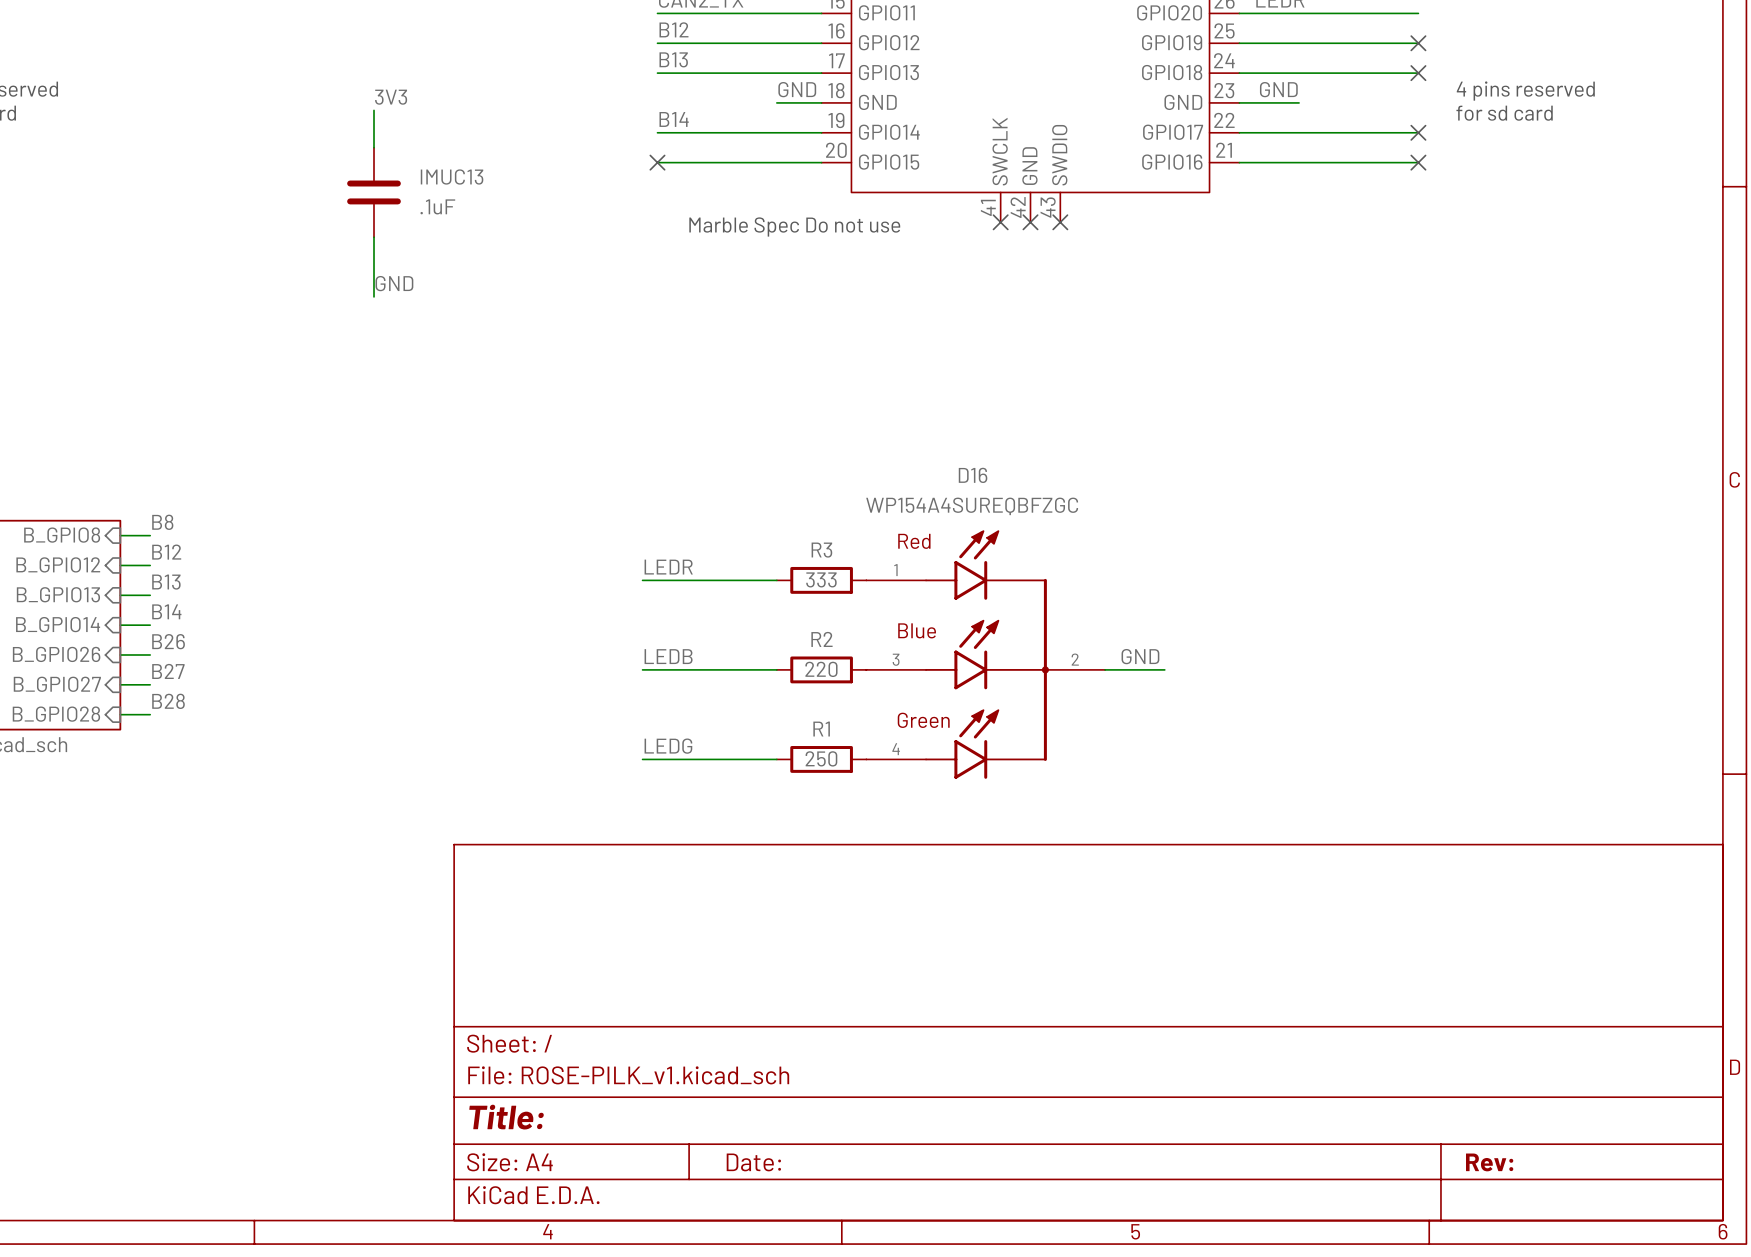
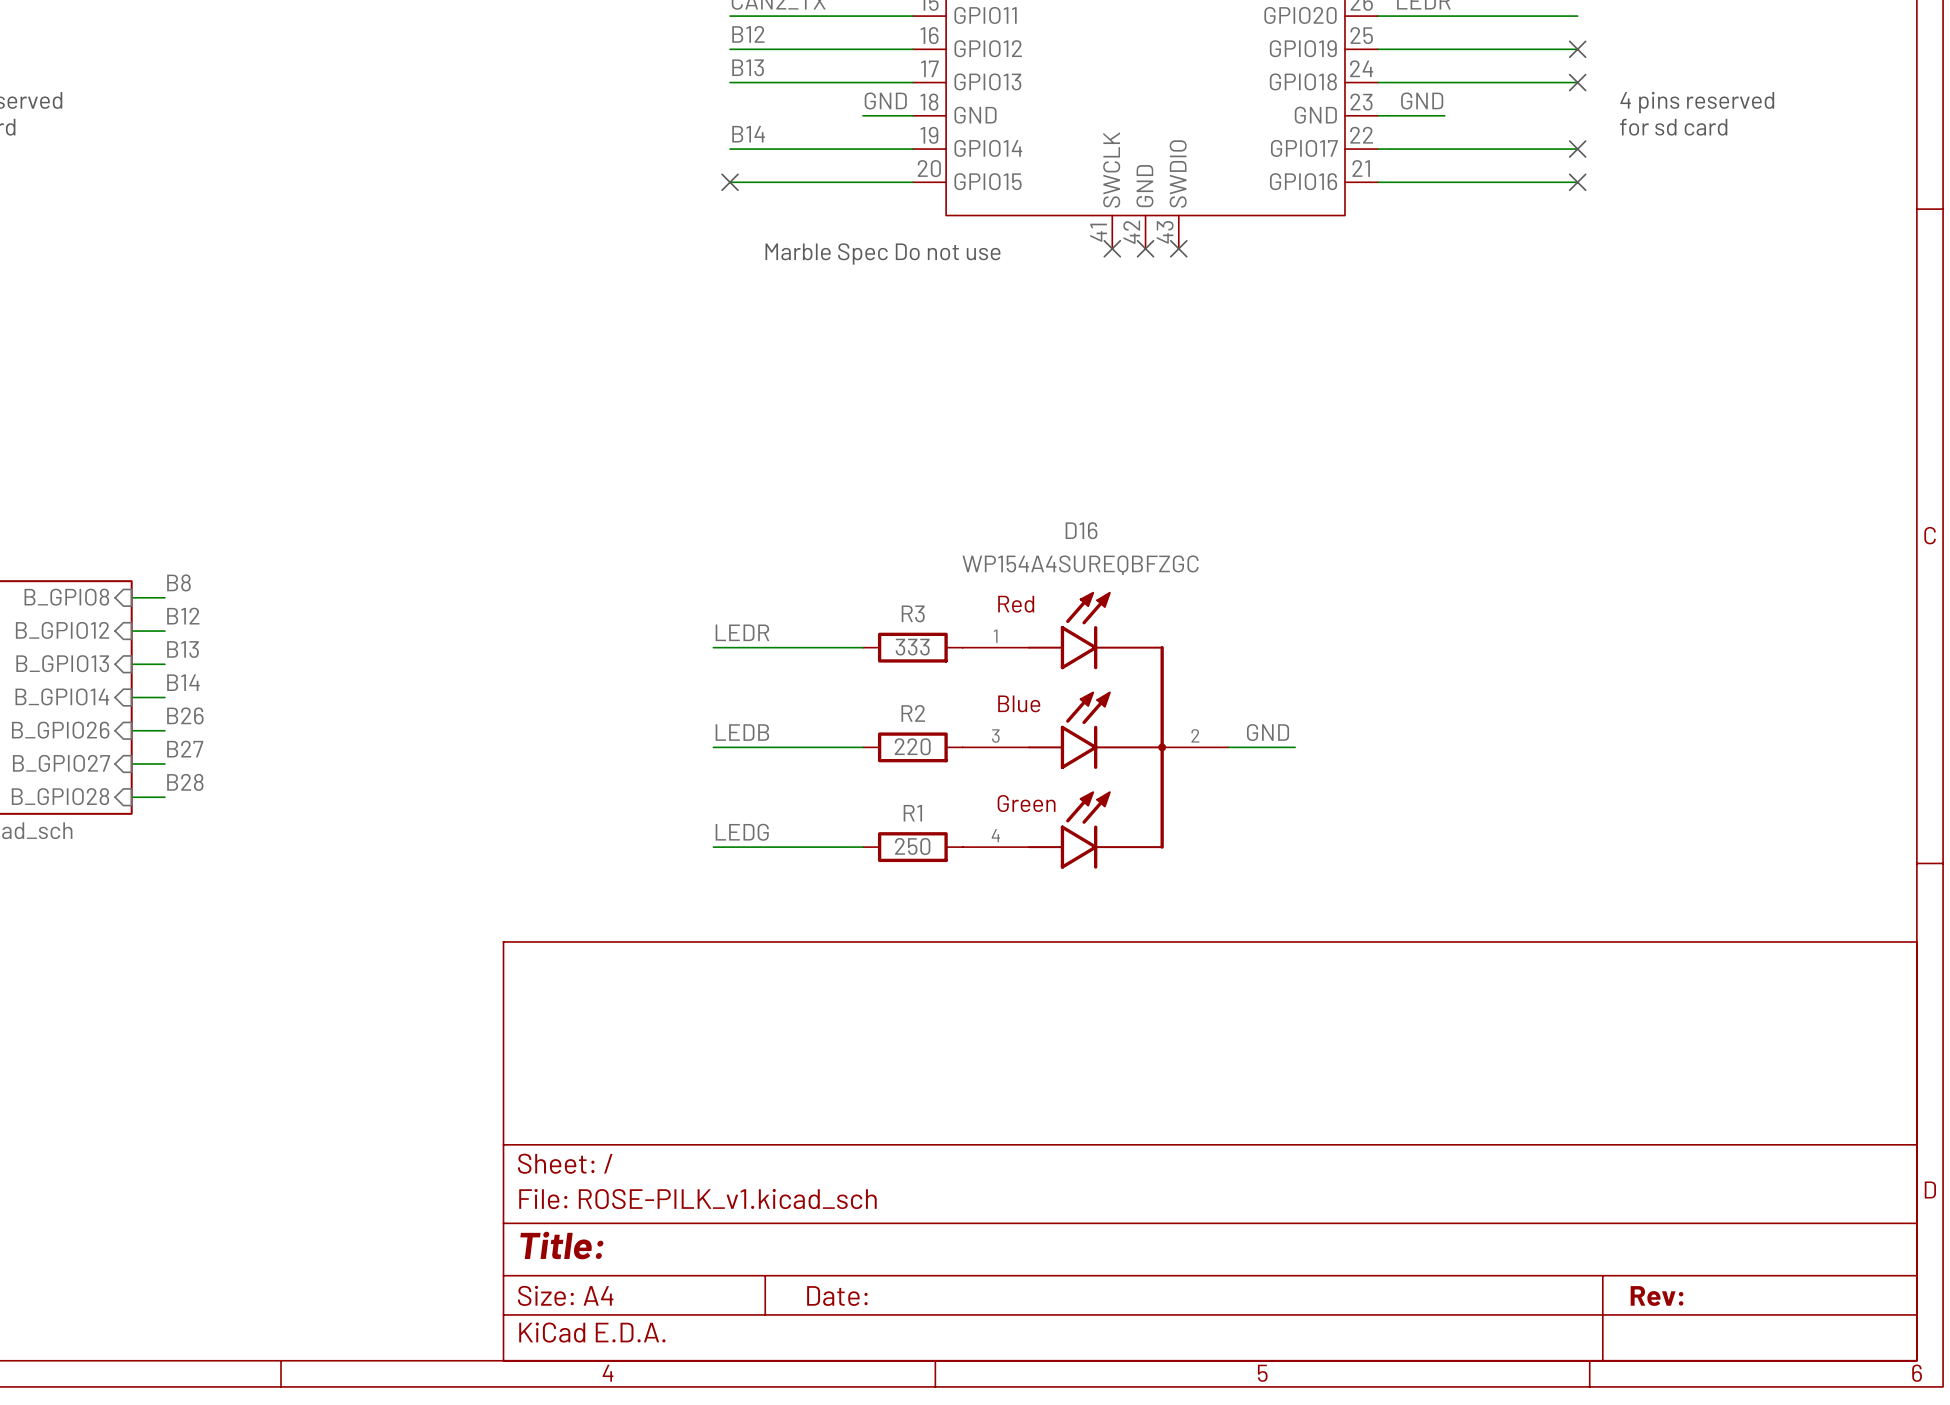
label: 3V3 (391, 97) -> none
wire: (374, 110) (374, 147) -> none
IMUC13: .1uF (374, 192) -> none
wire: (374, 237) (374, 296) -> none
label: GND (394, 283) -> none

